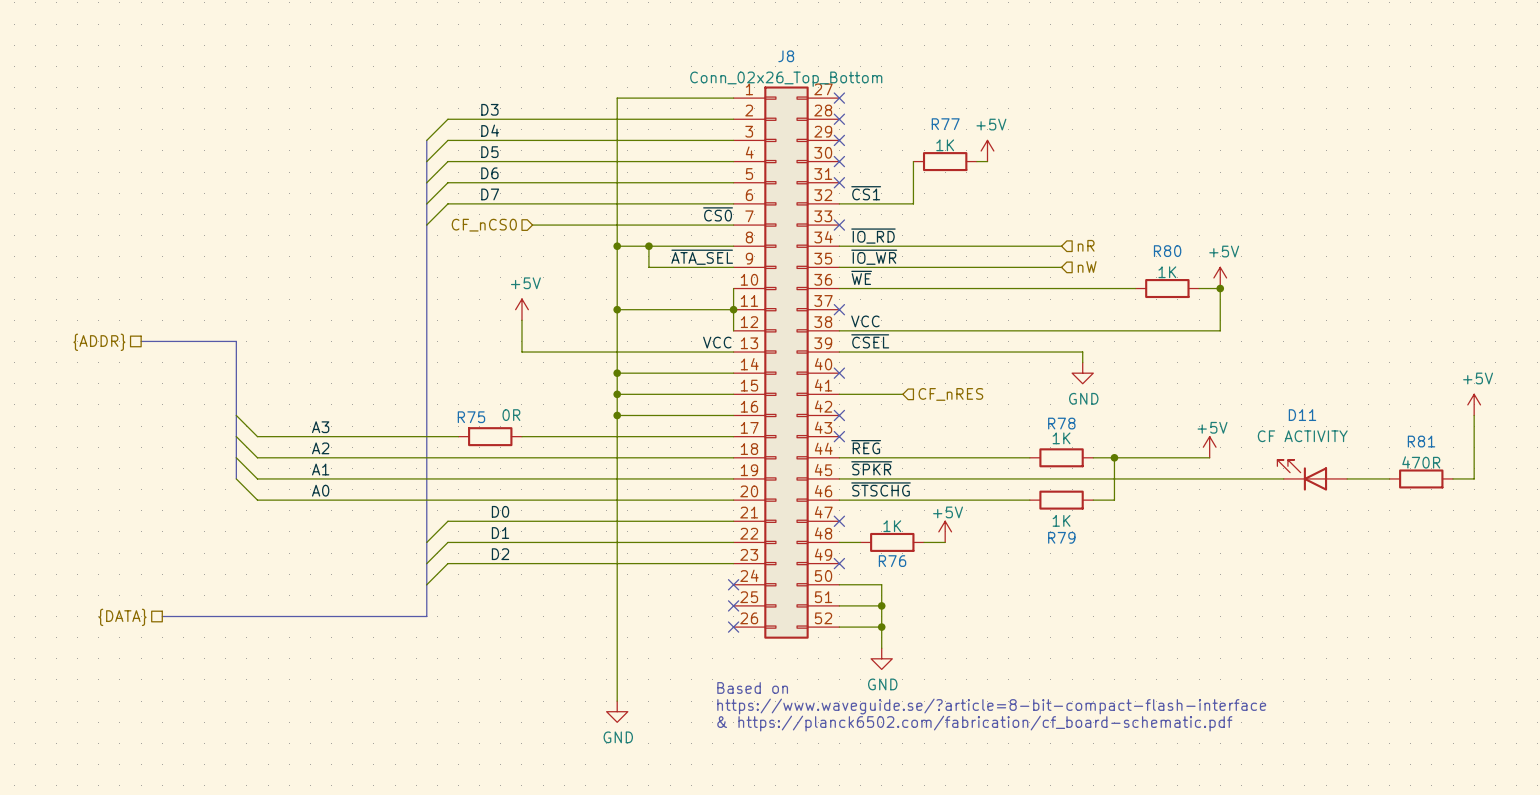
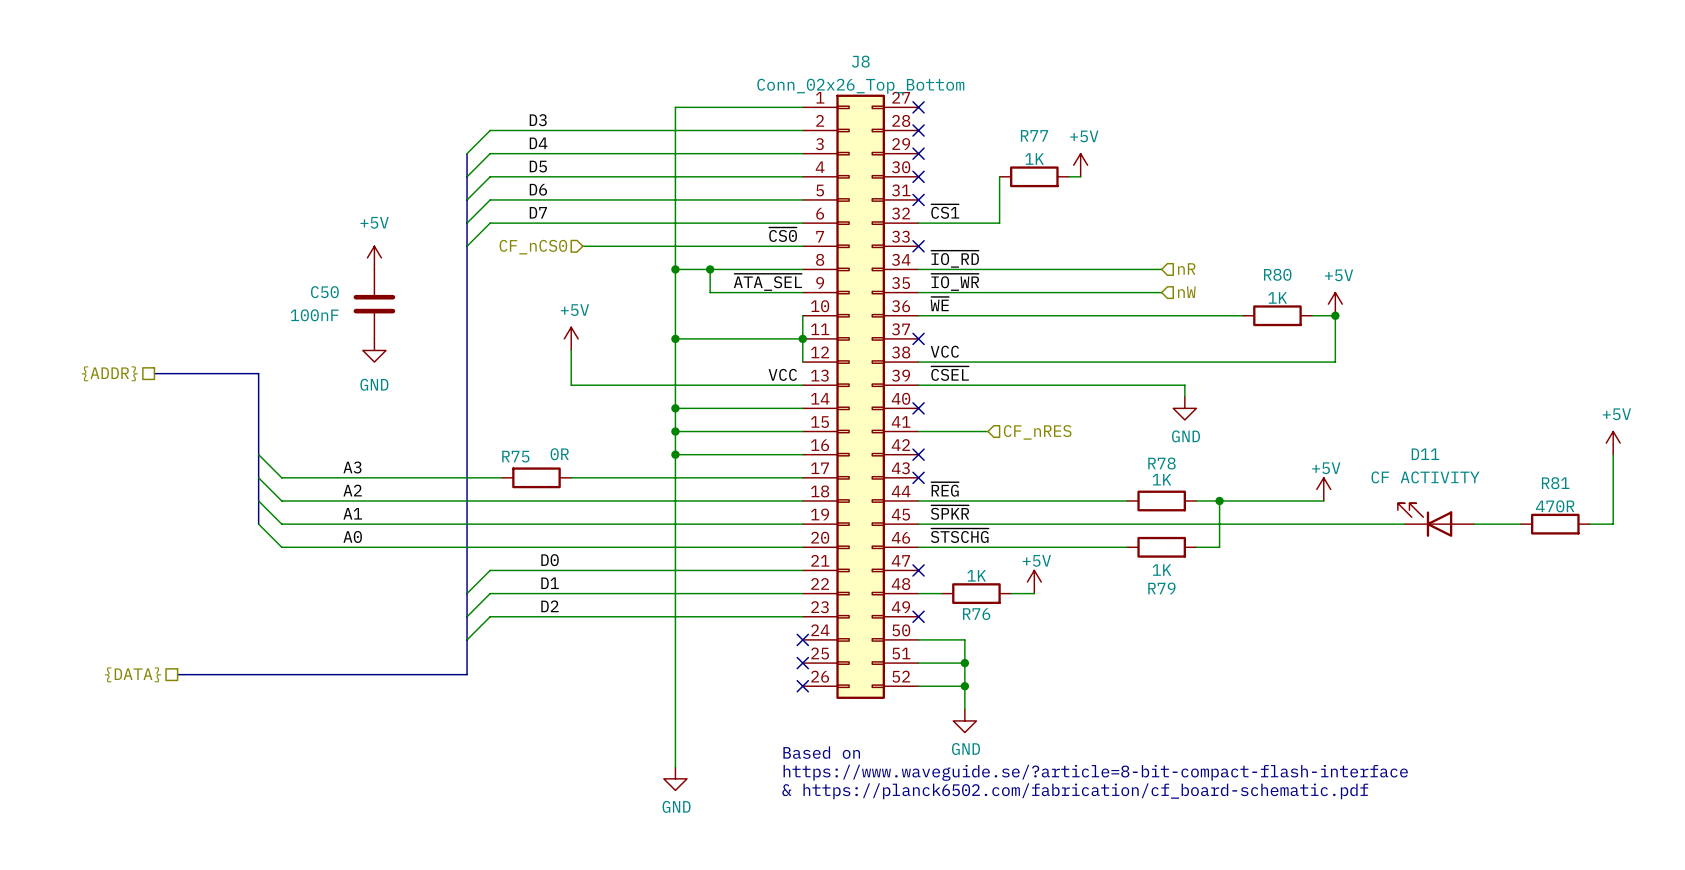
power symbol: none -> +5V (374, 257)
C50: none -> 100nF (374, 304)
power symbol: none -> GND (374, 350)

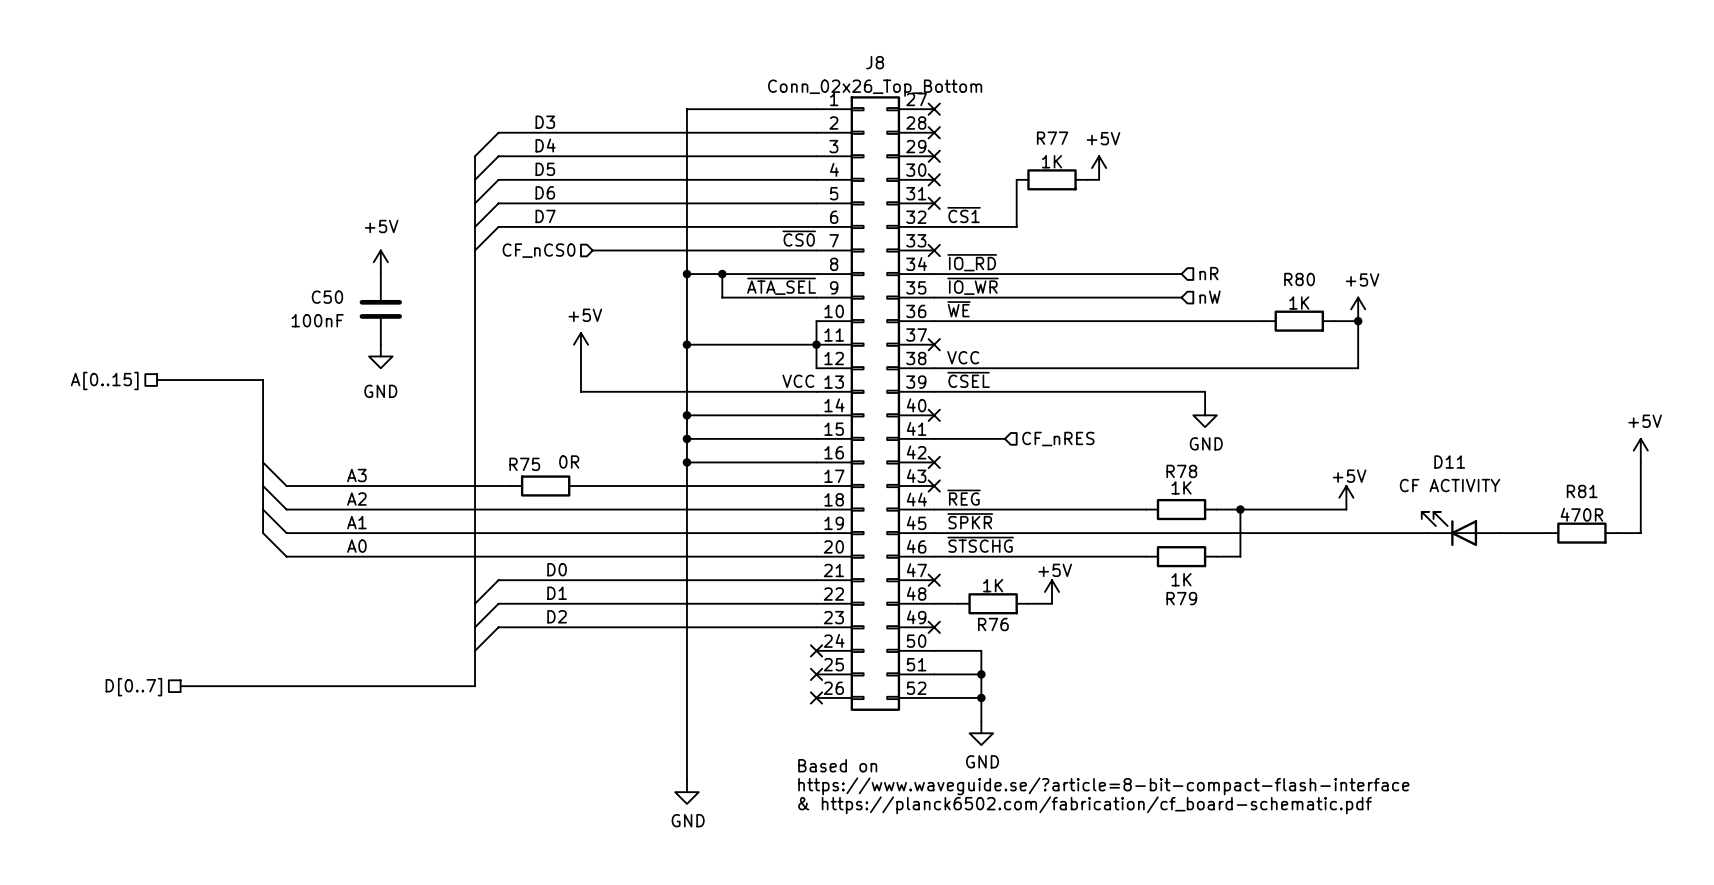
hierarchical label: {ADDR} (109, 373) -> A[0..15] (104, 380)
hierarchical label: {DATA} (133, 674) -> D[0..7] (133, 687)

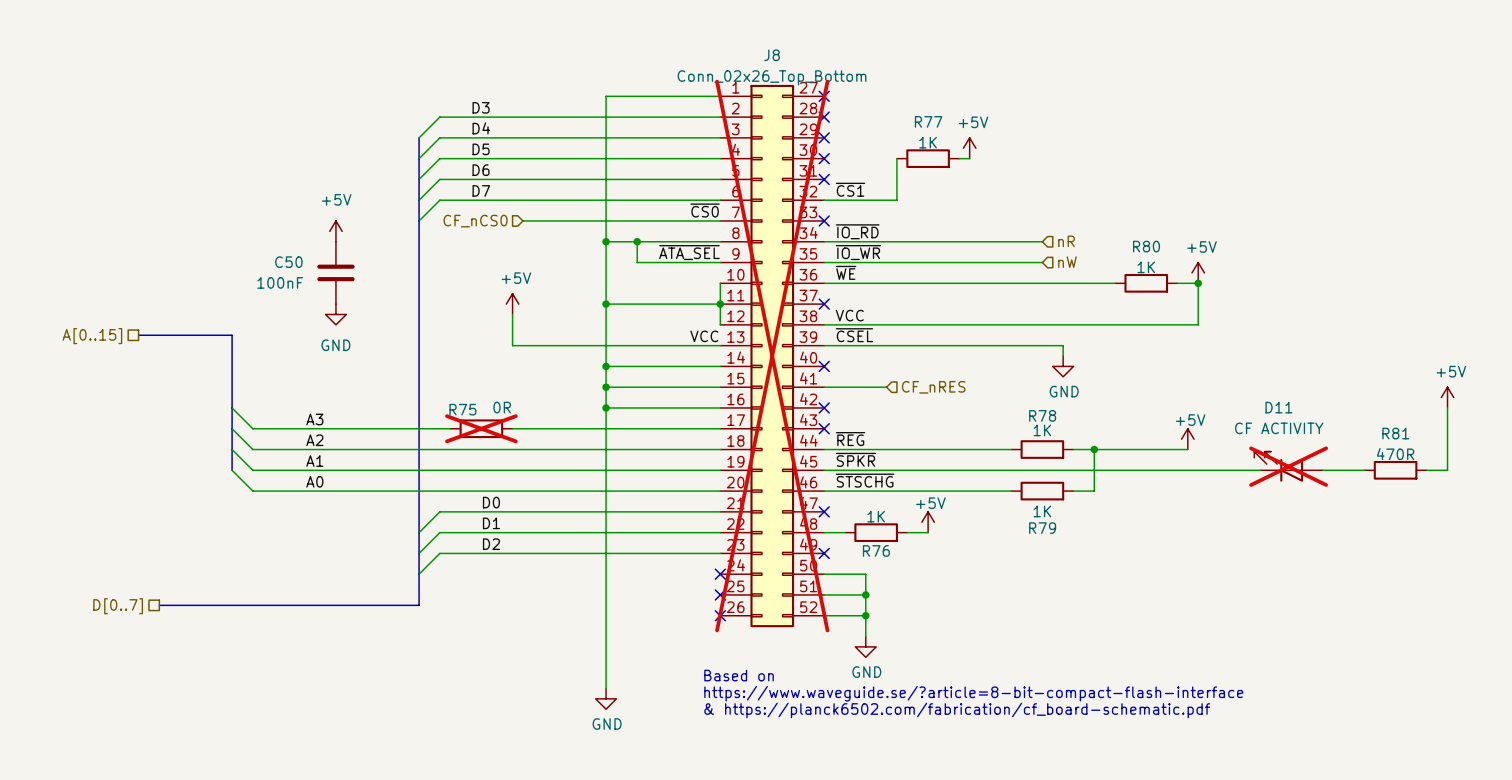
J8 do-not-place cross: none -> (772, 356)
R75 do-not-place cross: none -> (481, 428)
D11 do-not-place cross: none -> (1288, 466)

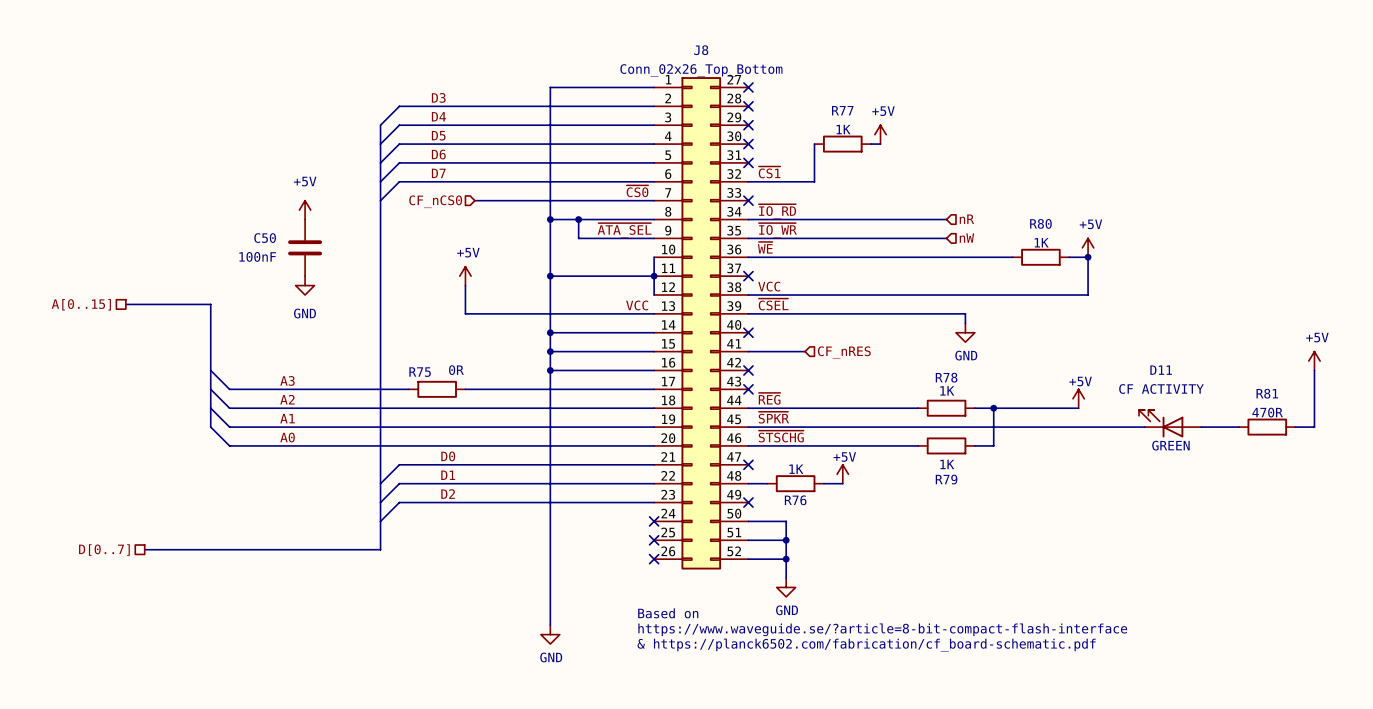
J8 do-not-place cross: (772, 356) -> none
R75 do-not-place cross: (481, 428) -> none
D11 do-not-place cross: (1288, 466) -> none
text: none -> GREEN (1170, 445)

